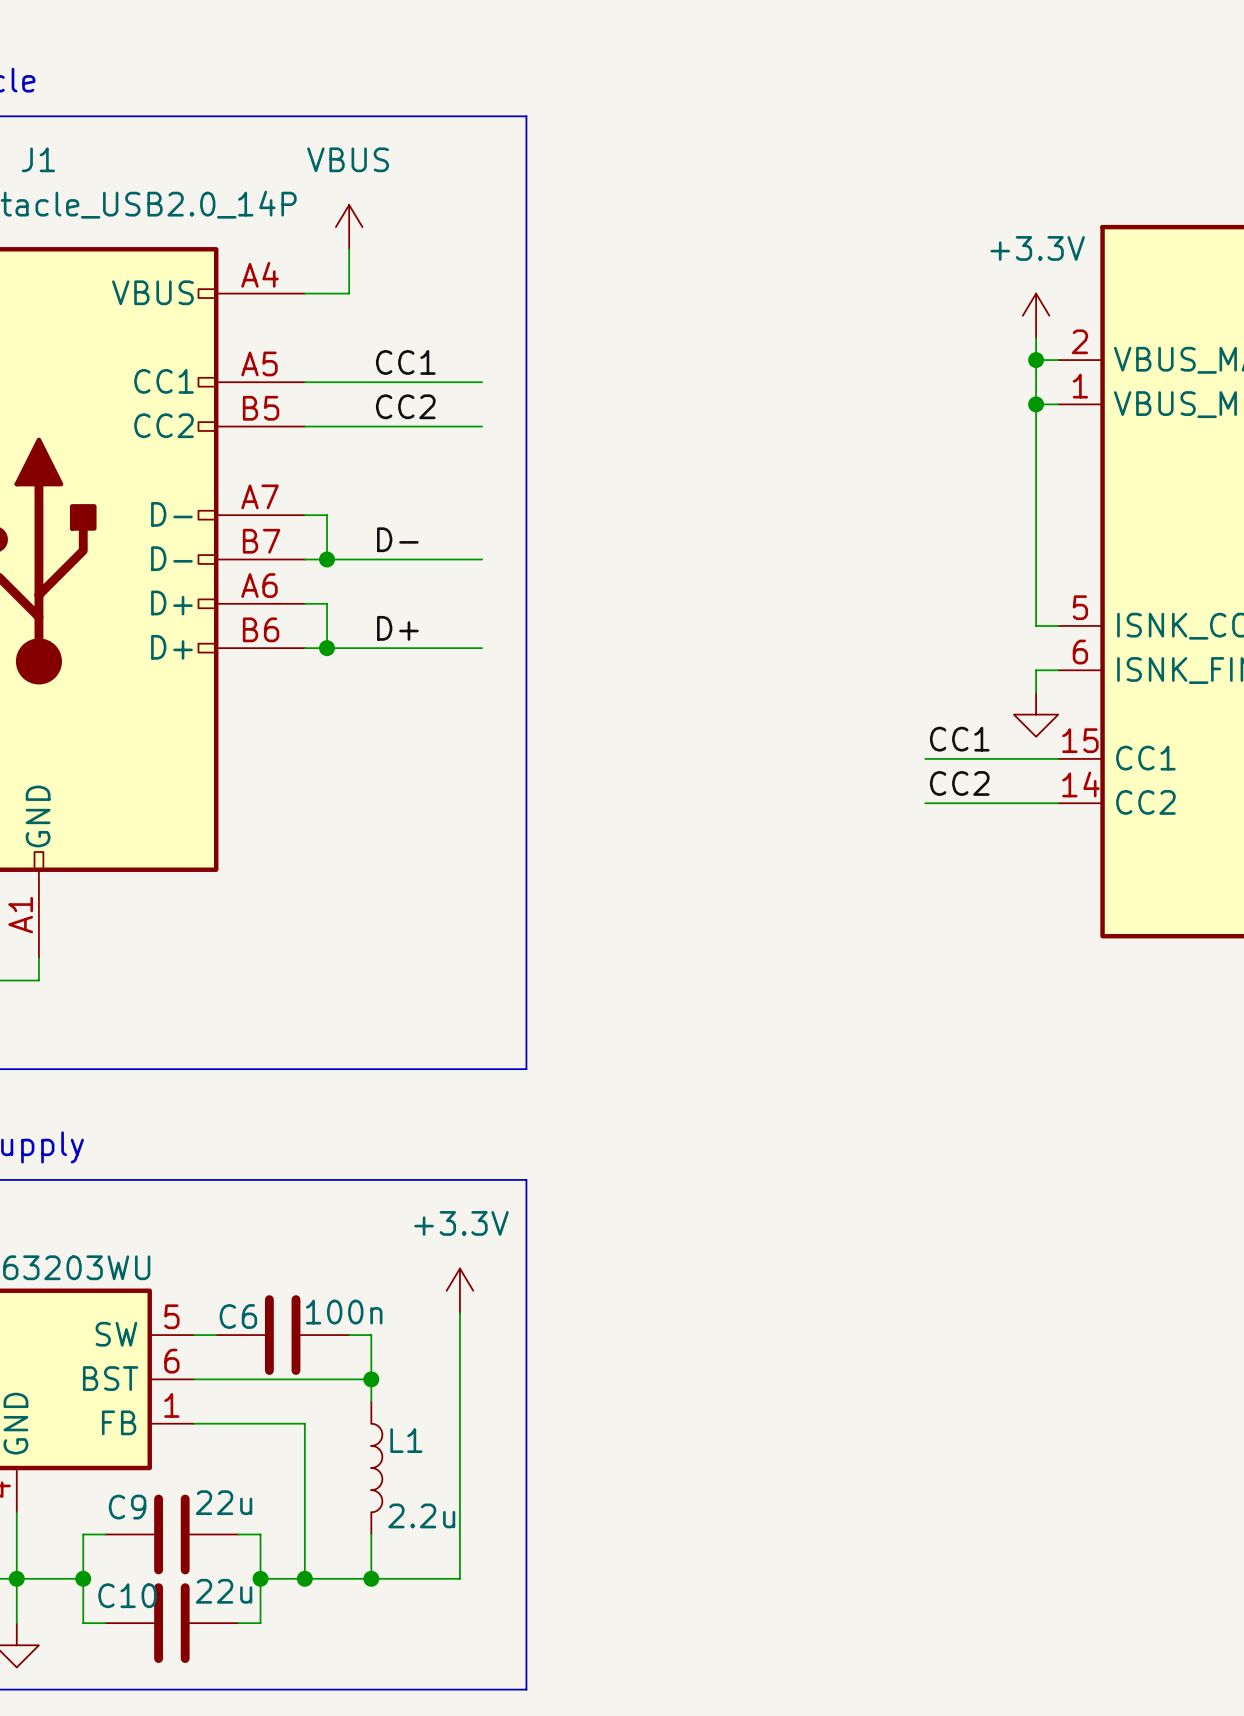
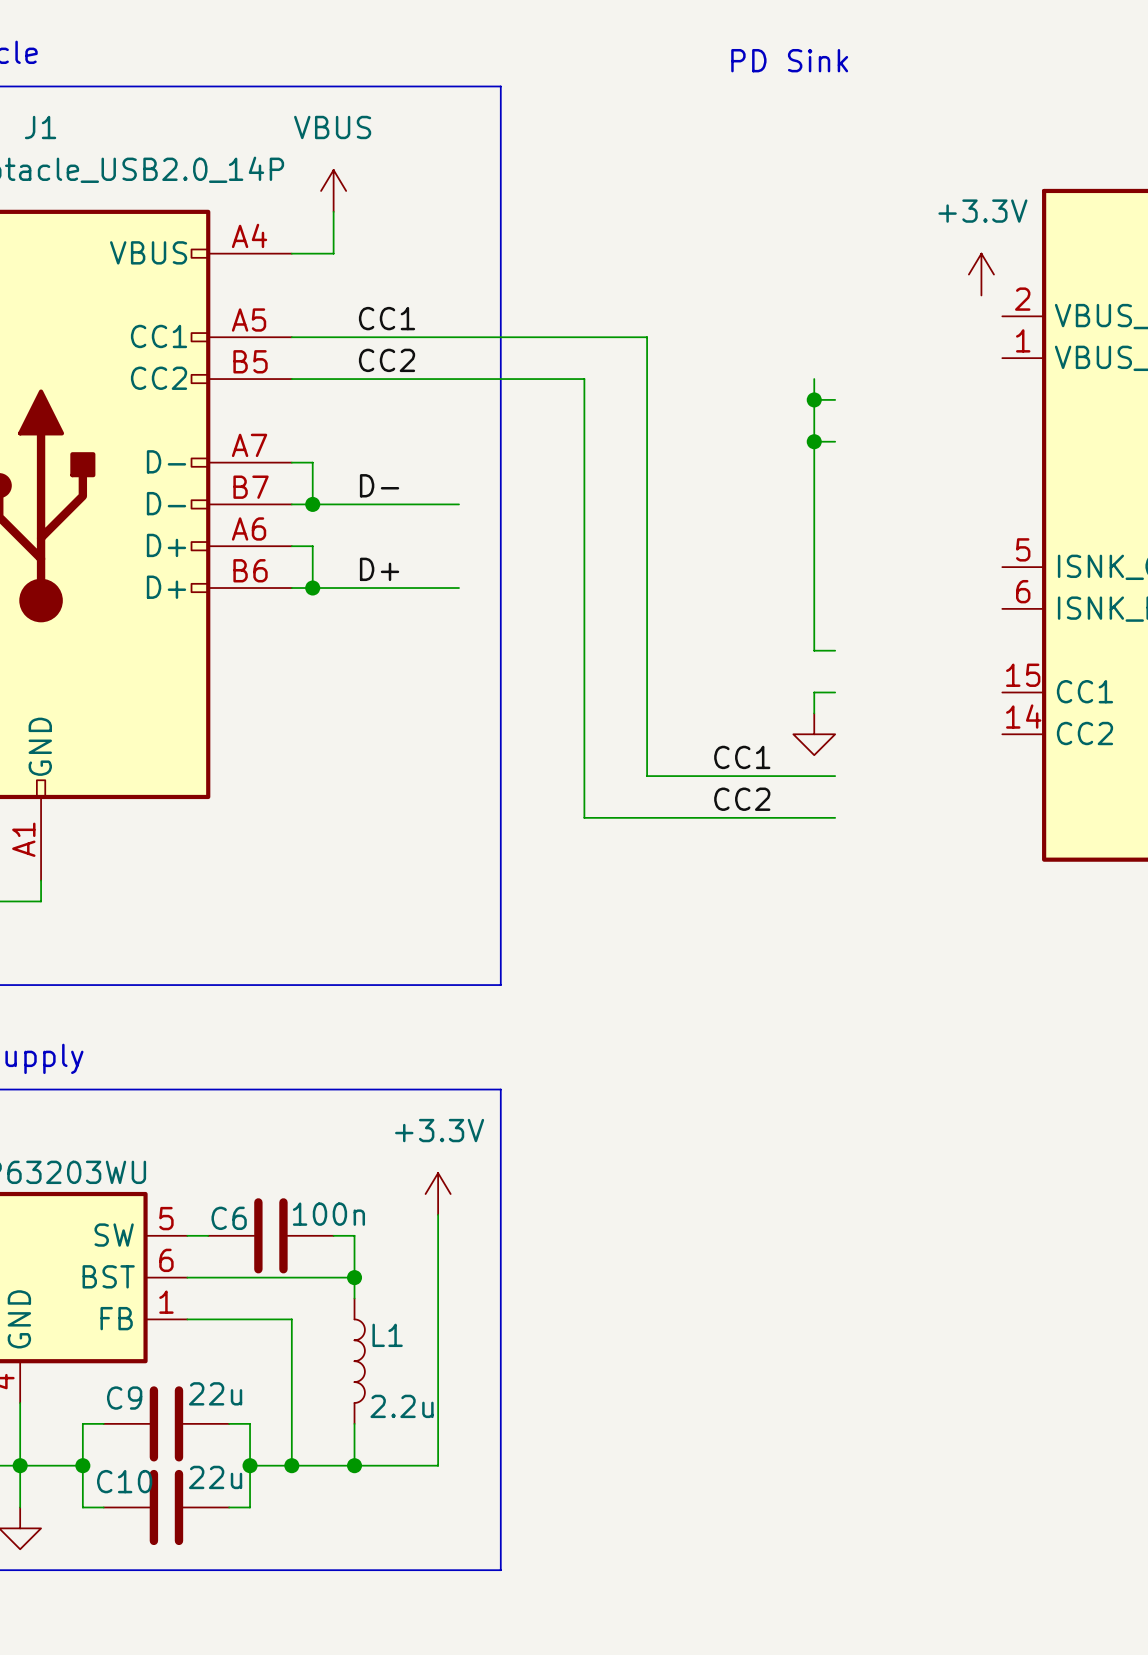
text: none -> PD Sink (789, 60)
wire: (1036, 337) (1036, 625) (1058, 625) -> (814, 379) (814, 650) (835, 650)
wire: (1036, 360) (1058, 360) -> (814, 399) (835, 399)
junction: (1036, 360) -> none
wire: none -> (459, 337) (647, 337) (647, 776) (835, 776)
wire: (1036, 404) (1058, 404) -> (814, 441) (835, 441)
junction: (1036, 404) -> none
wire: none -> (459, 379) (584, 379) (584, 817) (835, 817)
junction: none -> (814, 399)
junction: none -> (814, 441)
wire: (1058, 670) (1036, 670) (1036, 692) -> (835, 692) (814, 692) (814, 713)
power symbol position: (1036, 714) -> (814, 734)
label position: CC1 (959, 739) -> CC1 (742, 757)
wire: (925, 758) (1058, 758) -> none
label position: CC2 (959, 783) -> CC2 (742, 799)
wire: (925, 803) (1058, 803) -> none

